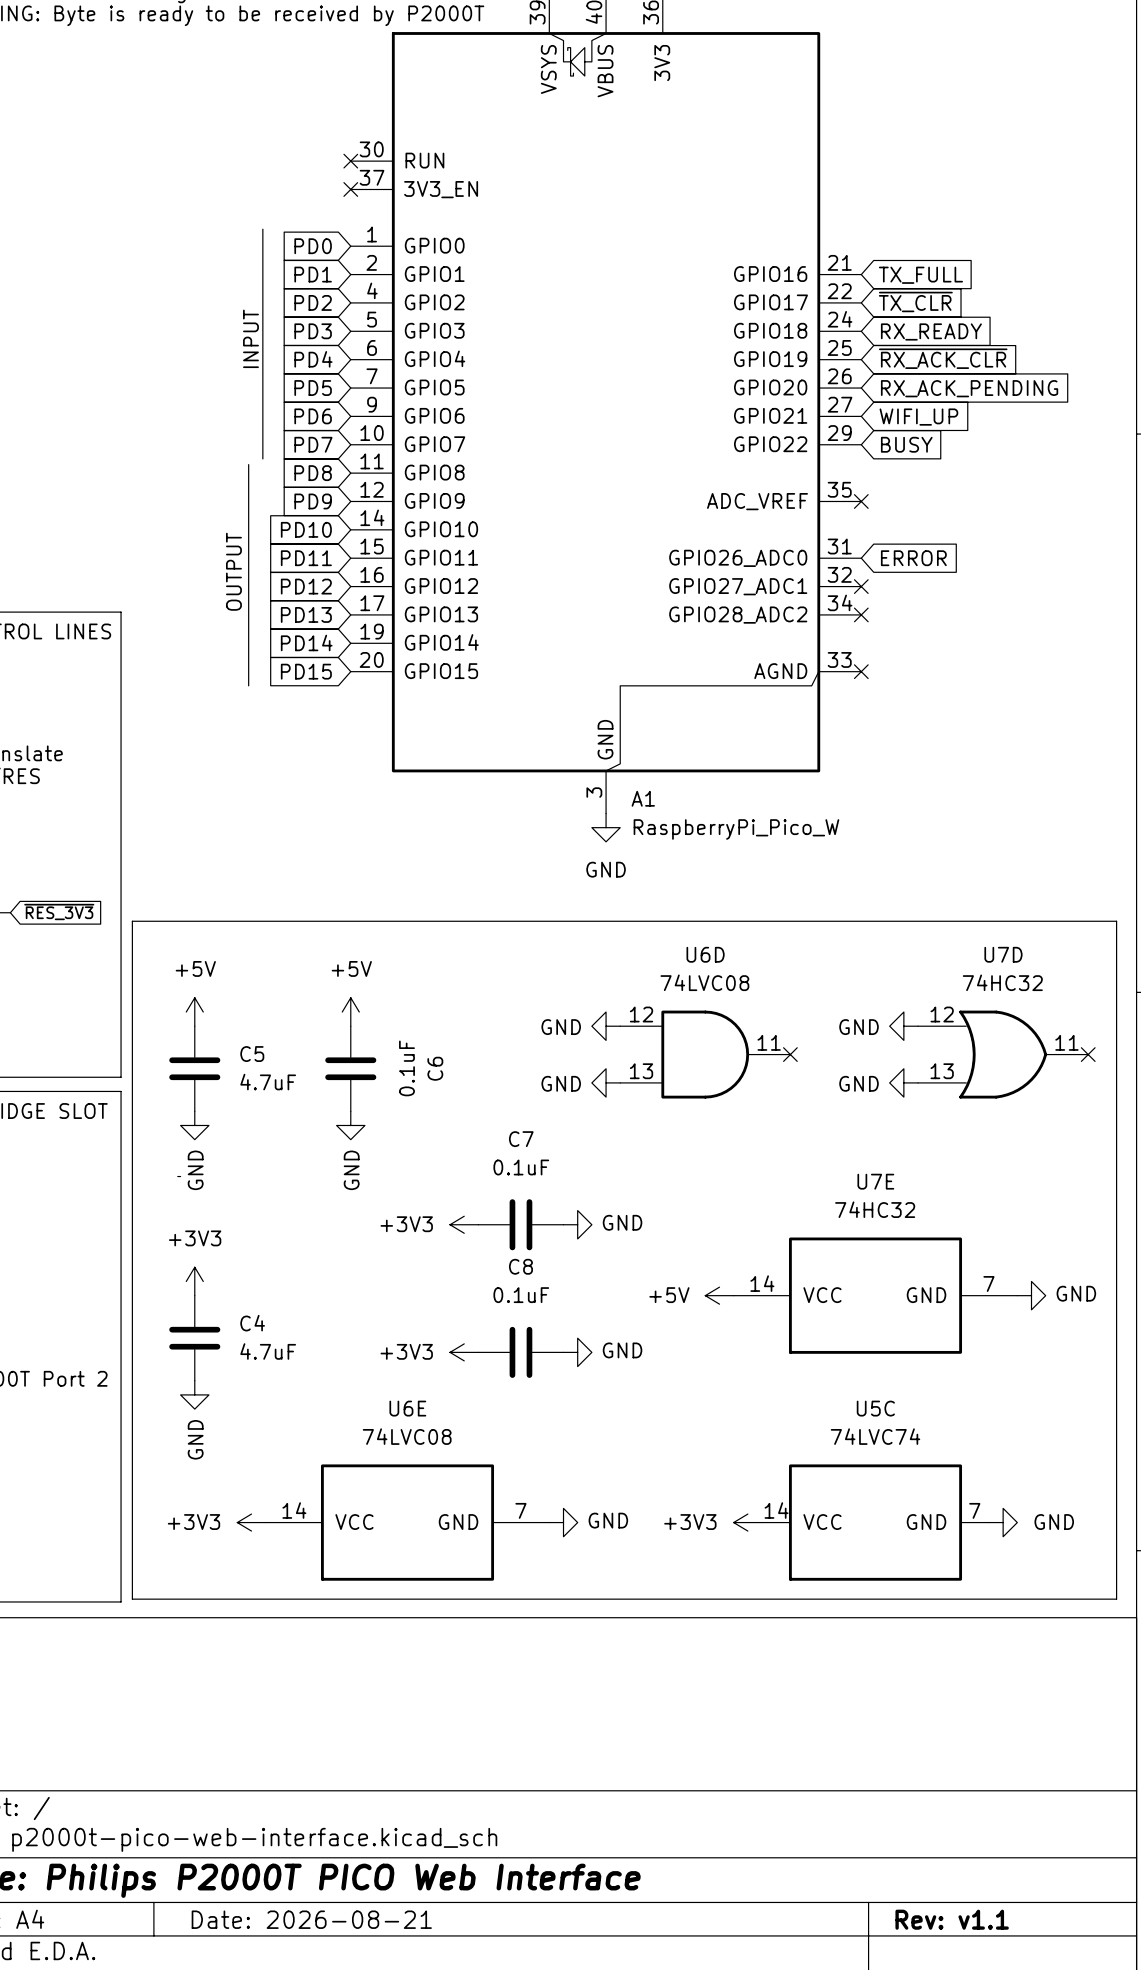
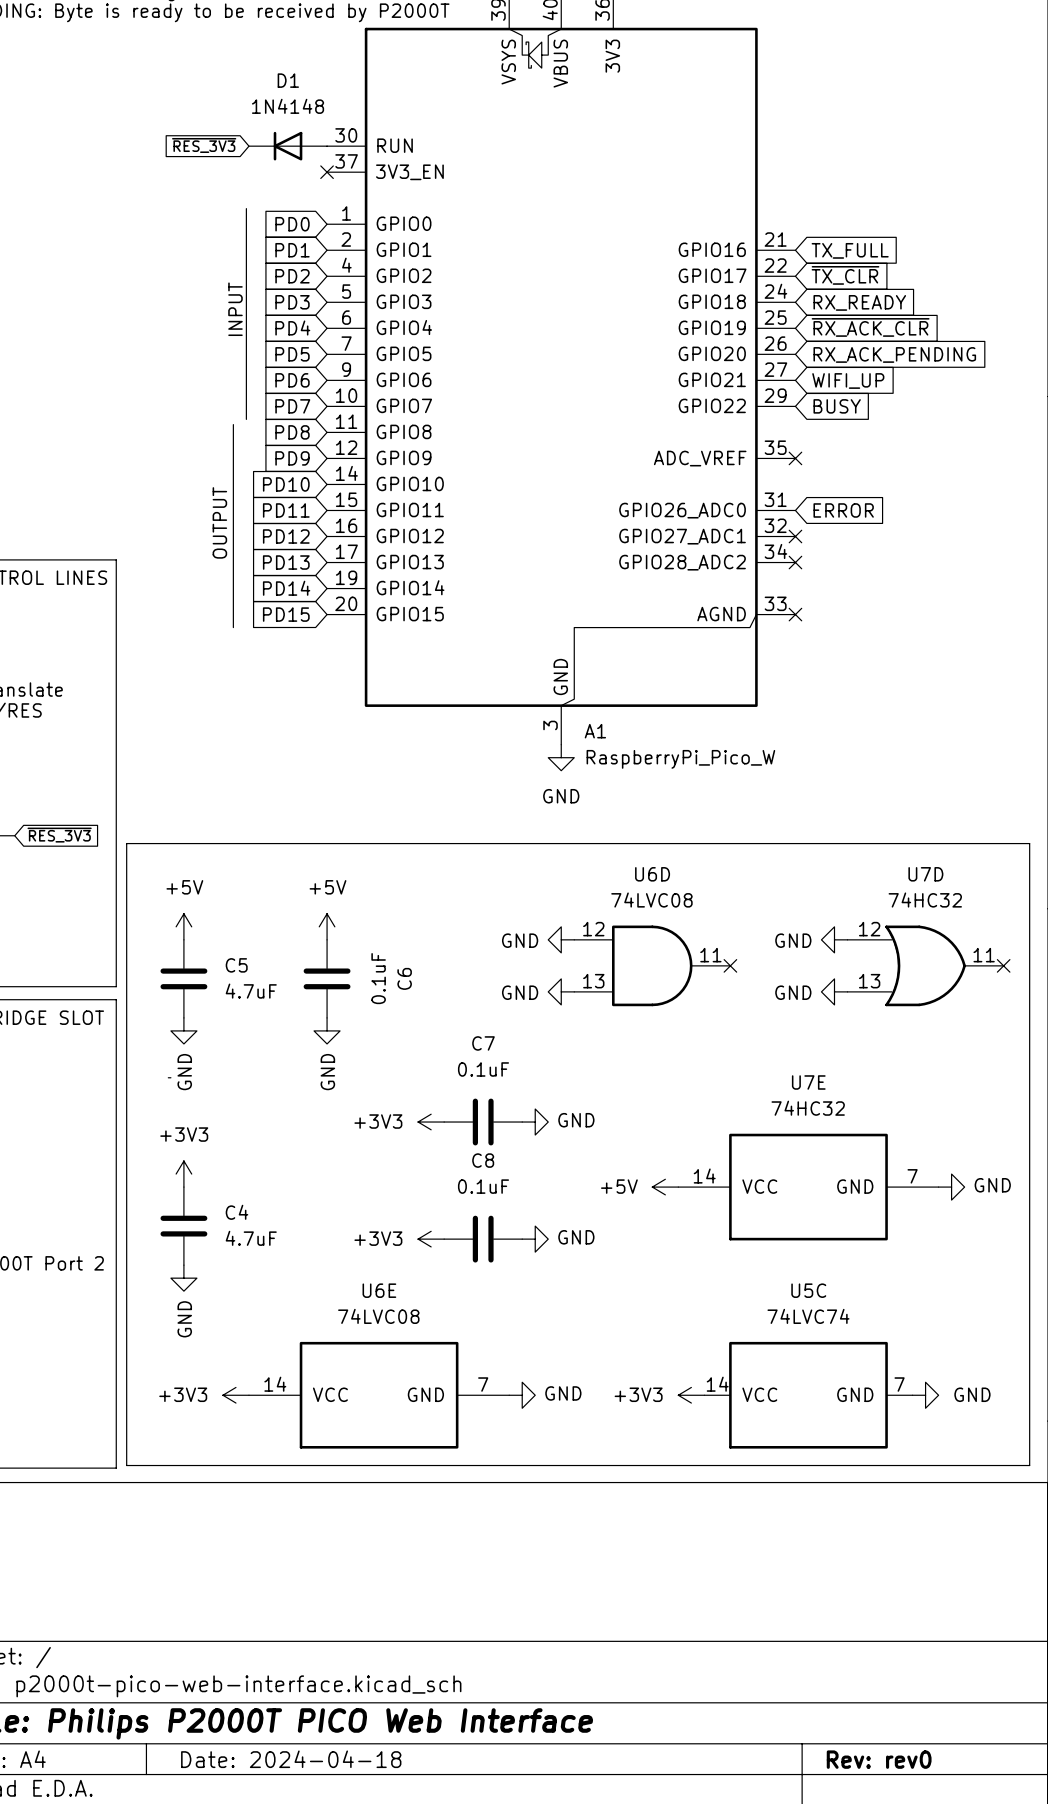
global label: none -> ~{RES_3V3} (204, 145)
D1: none -> 1N4148 (288, 146)
no-connect mark: (350, 161) -> none
title block: Date: 2026-08-21 (311, 1919) -> Date: 2024-04-18 (291, 1759)
title block: Rev: v1.1 (952, 1919) -> Rev: rev0 (879, 1759)

